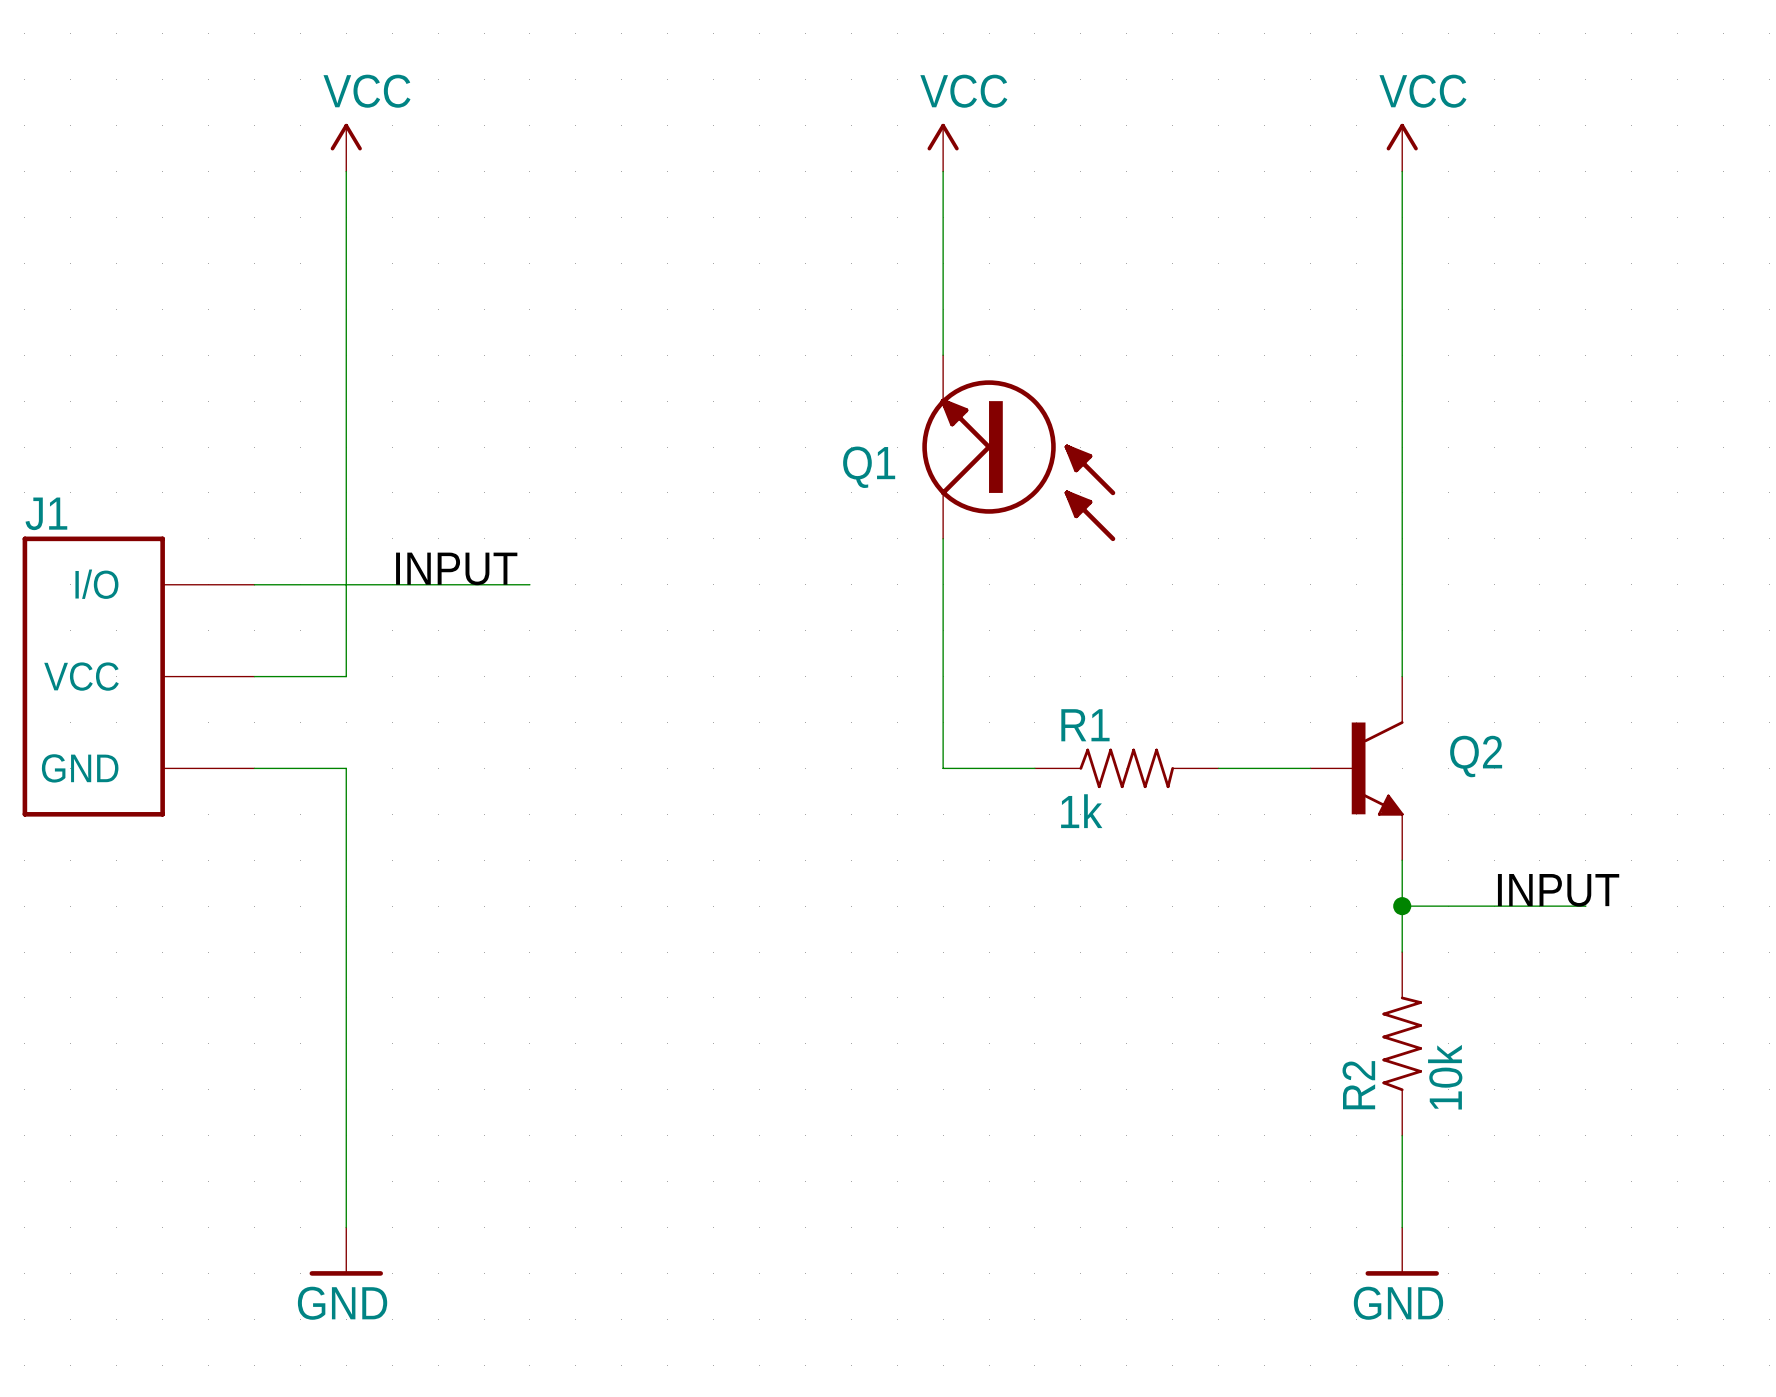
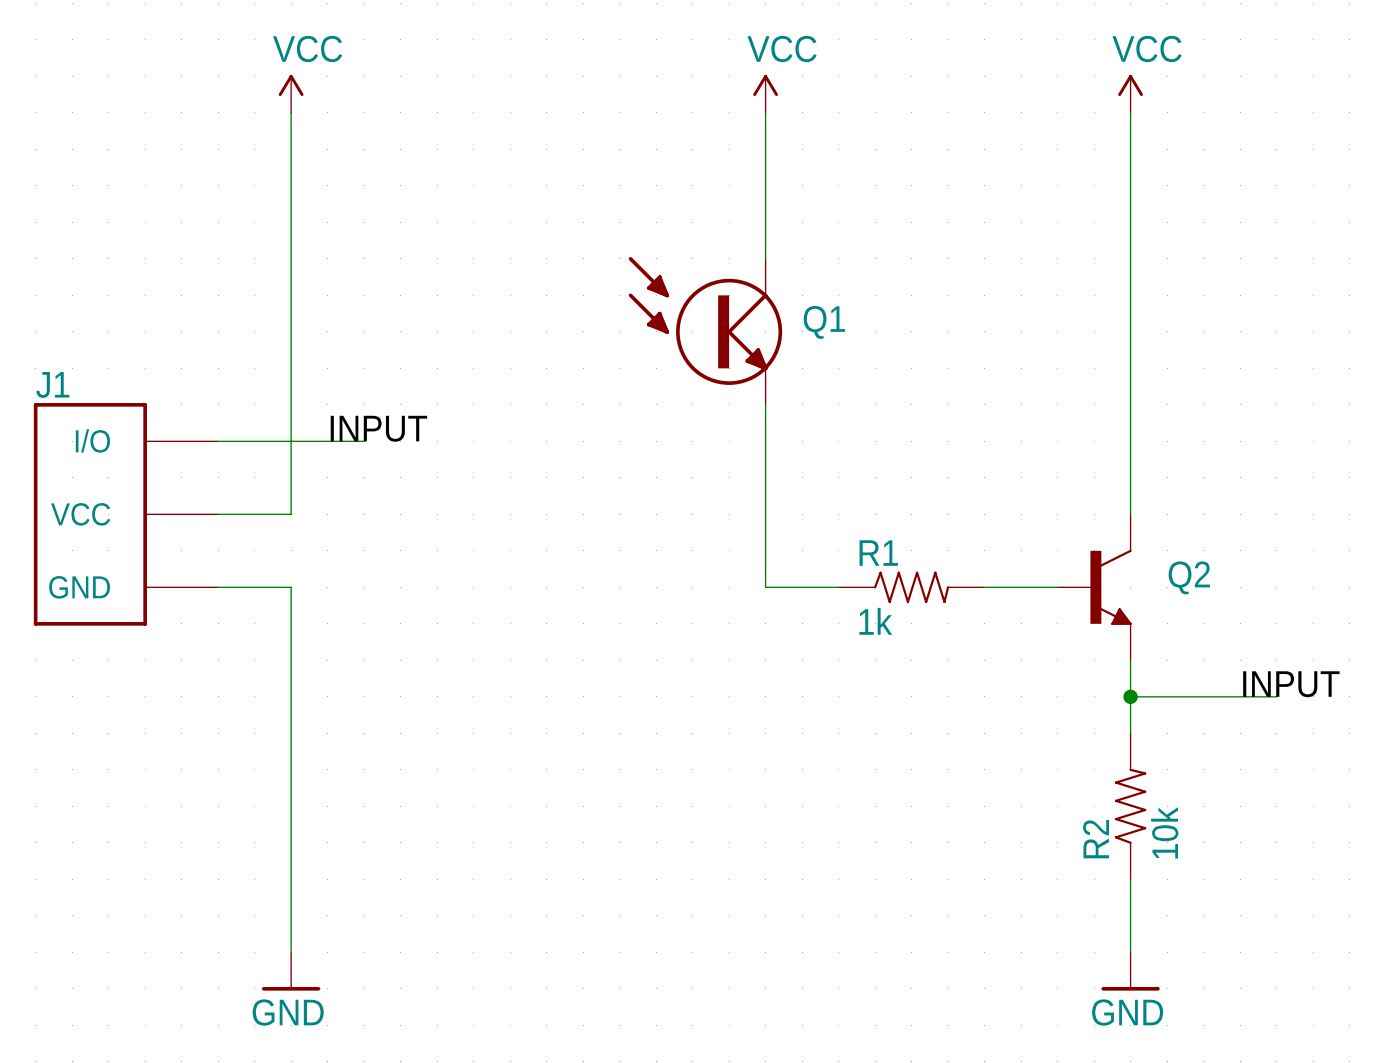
Q1 position: (1018, 448) -> (705, 330)
Q1 rotation: 0° (1018, 460) -> 180° (705, 320)
wire: (438, 584) (529, 584) -> none
label position: INPUT (1558, 890) -> INPUT (1291, 684)

